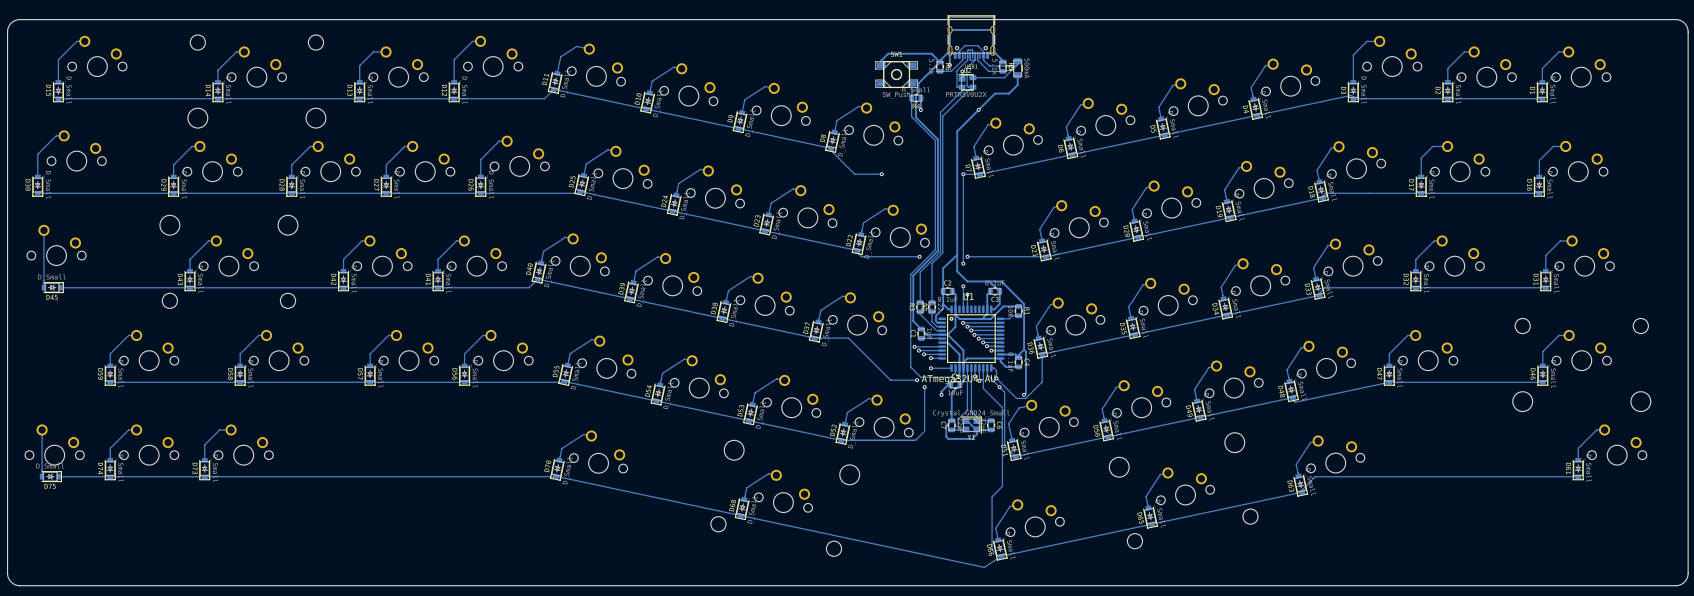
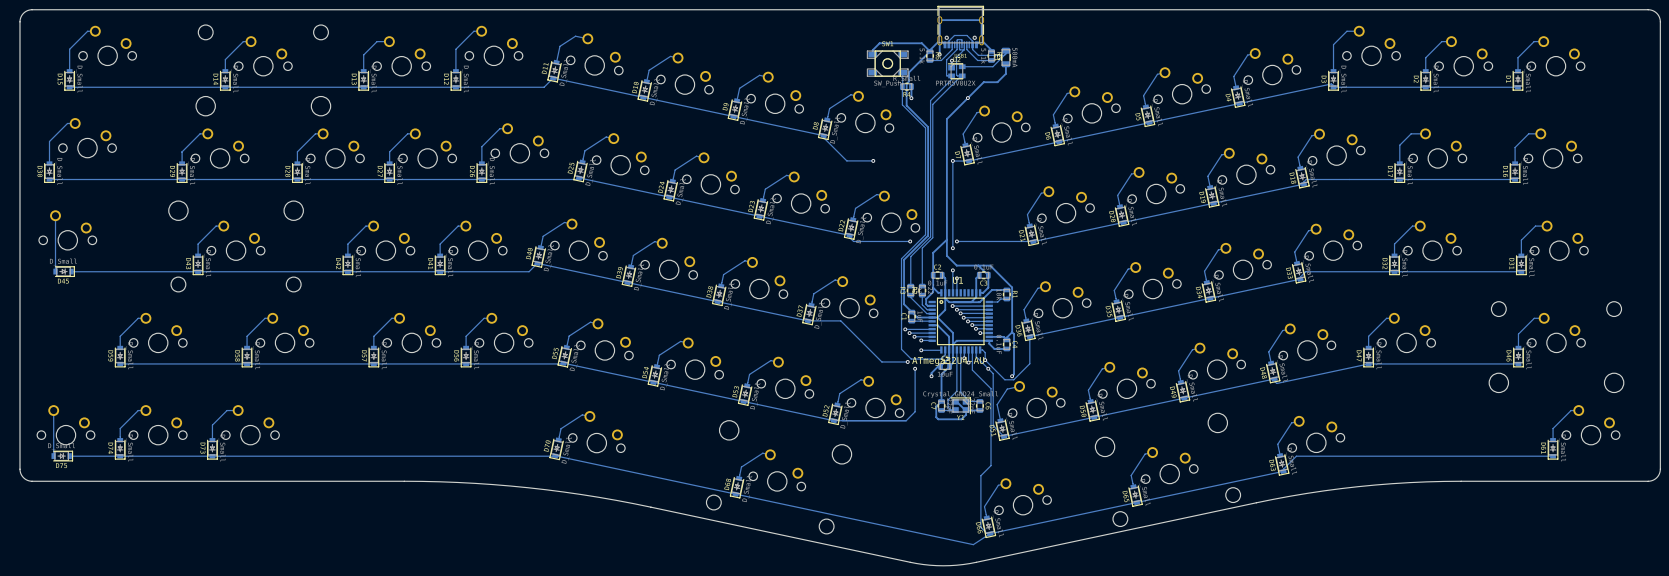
board edge: (1675, 19) (16, 19) (10, 24) (7, 31) (7, 576) (12, 583) (19, 585) (1678, 585) (1685, 580) (1688, 573) (1688, 31) (1684, 23) (1675, 19) -> (1648, 9) (1656, 13) (1660, 21) (1660, 469) (1657, 476) (1651, 480) (1444, 481) (1341, 488) (1273, 499) (976, 562) (943, 565) (910, 562) (616, 500) (528, 487) (422, 481) (32, 481) (24, 478) (20, 472) (19, 21) (22, 14) (28, 10) (1648, 9)

